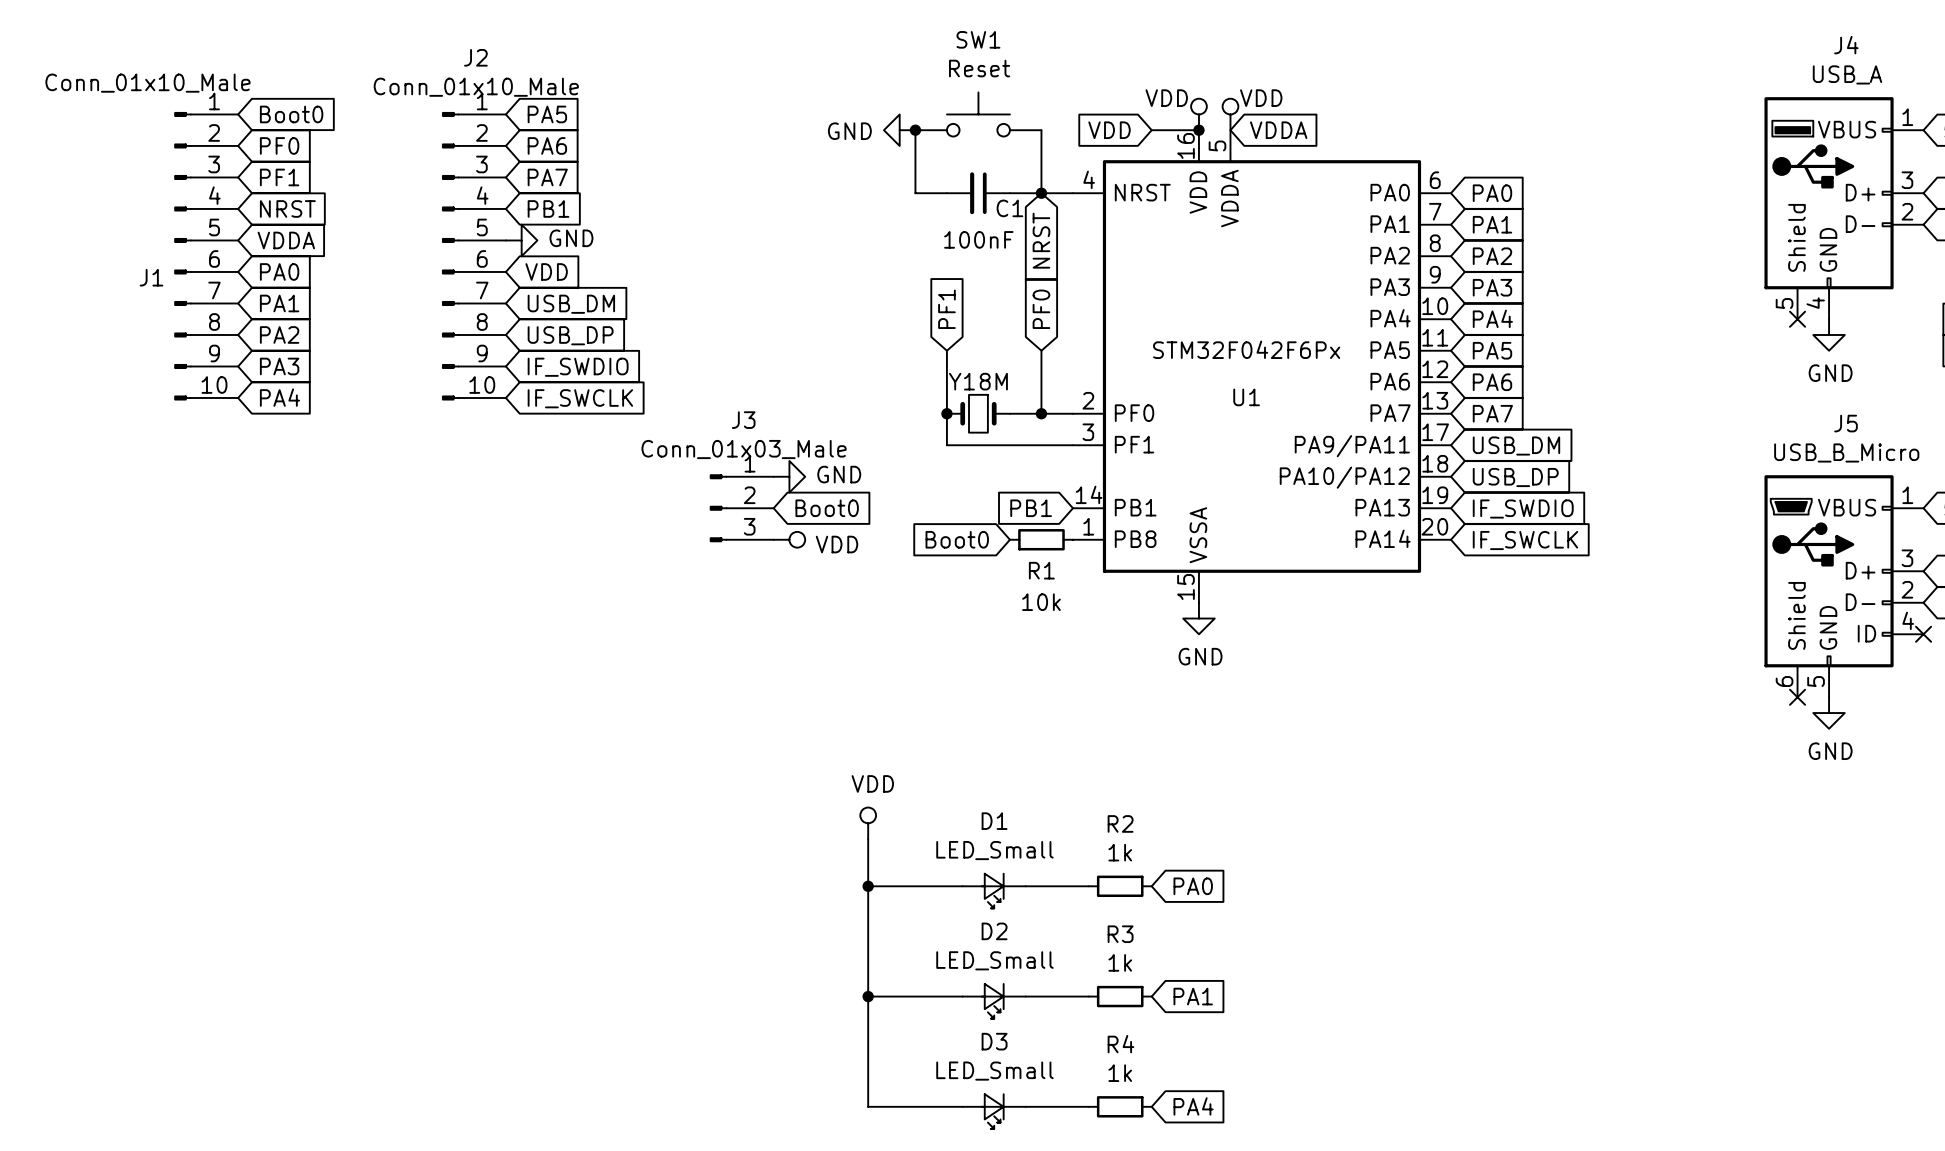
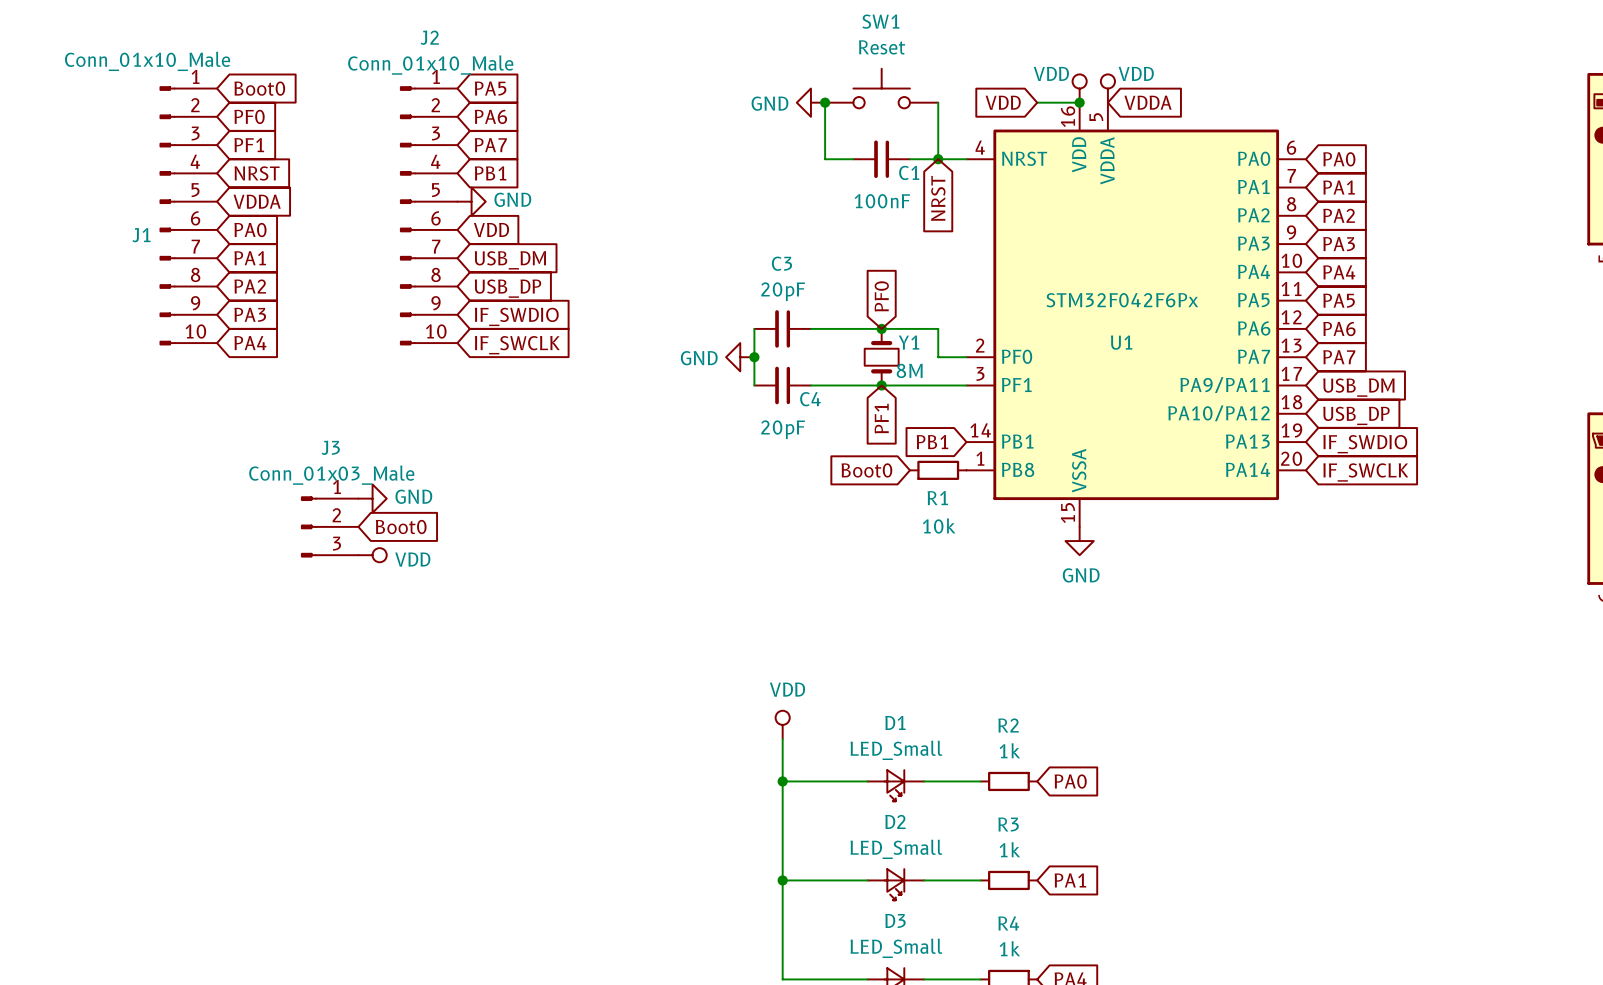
global label rotation: 0° (946, 309) -> 180° (881, 418)
global label position: PF1 (946, 309) -> PF1 (881, 418)
global label position: PF0 (1041, 309) -> PF0 (881, 296)
wire: (946, 350) (946, 445) -> (810, 385) (853, 385)
wire: (1041, 350) (1041, 382) -> (810, 328) (938, 328)
wire: none -> (754, 328) (754, 385)
C3: none -> 20pF (782, 328)
junction: none -> (881, 328)
junction: none -> (754, 357)
junction: (946, 413) -> none
Y1 rotation: 0° (978, 413) -> 90° clockwise (881, 357)
wire: (1009, 413) (1041, 413) -> none
junction: (1041, 413) -> none
C4: none -> 20pF (782, 385)
junction: none -> (881, 385)
power symbol rotation: 0° (789, 476) -> 180° (740, 357)
power symbol position: GND (789, 476) -> GND (740, 357)
J3 position: (741, 508) -> (329, 526)
global label: Boot0 (827, 508) -> none
power symbol: VDD (789, 539) -> none
power symbol: none -> GND (372, 498)
global label: none -> Boot0 (401, 527)
power symbol: none -> VDD (372, 555)

